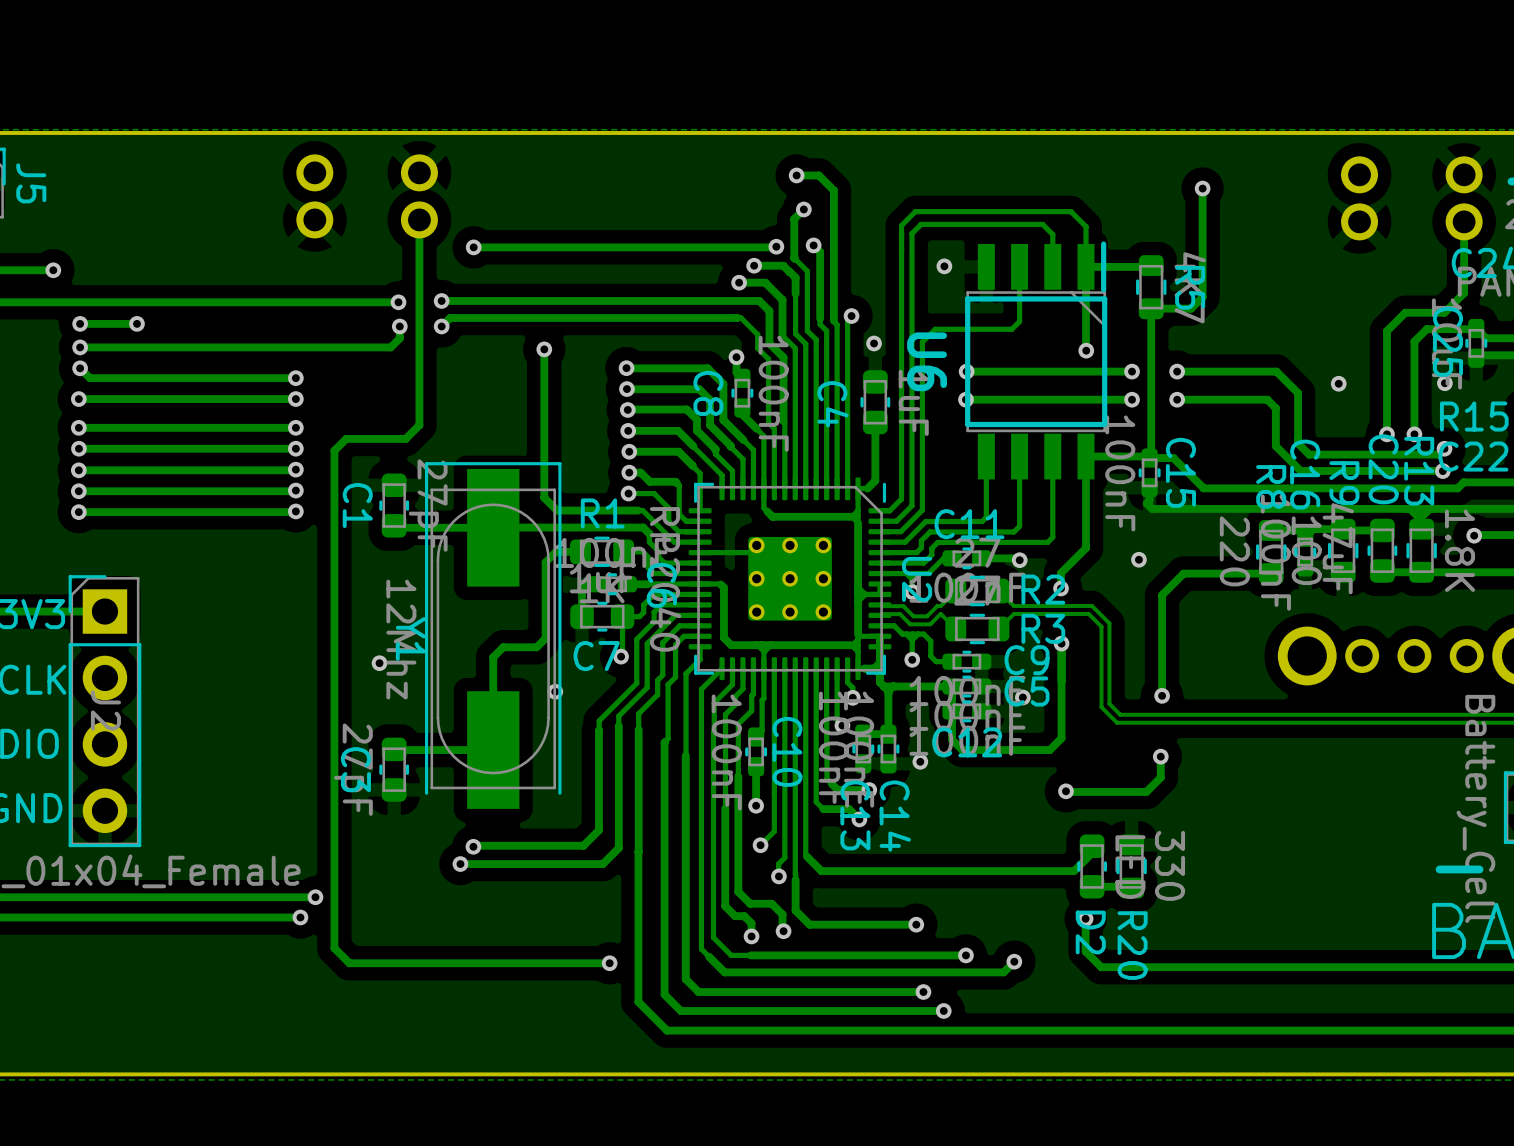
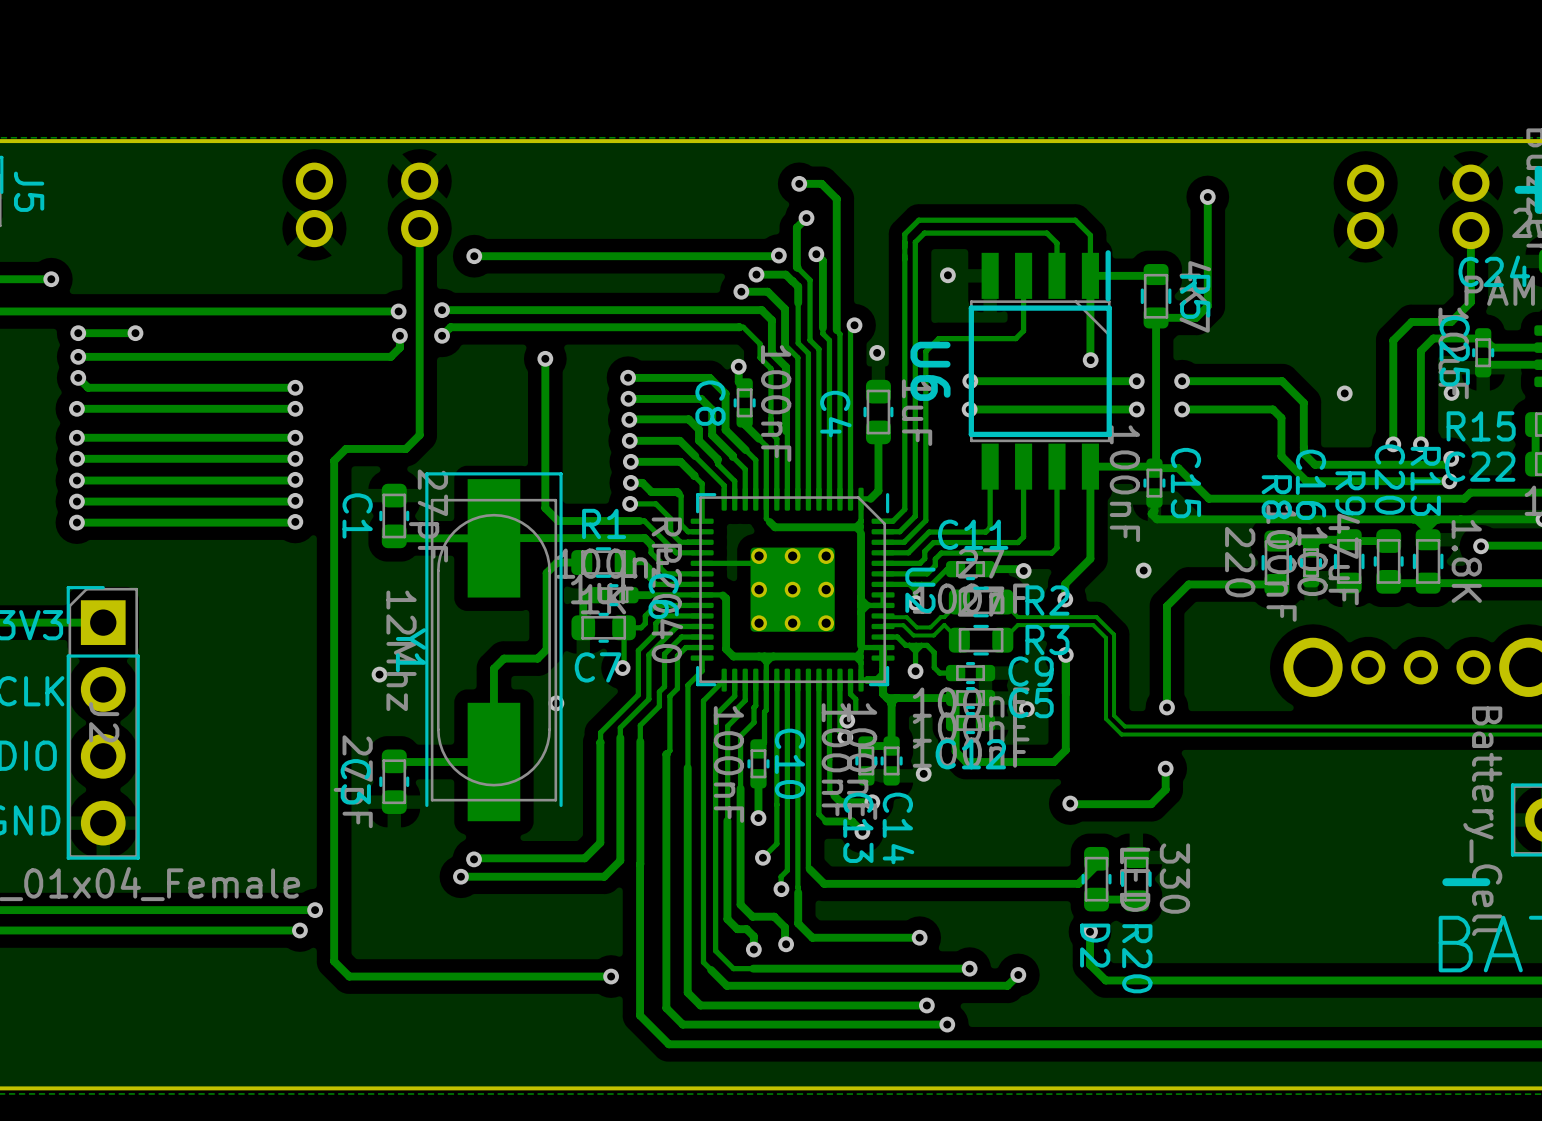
via position: (852, 697) -> (847, 720)

